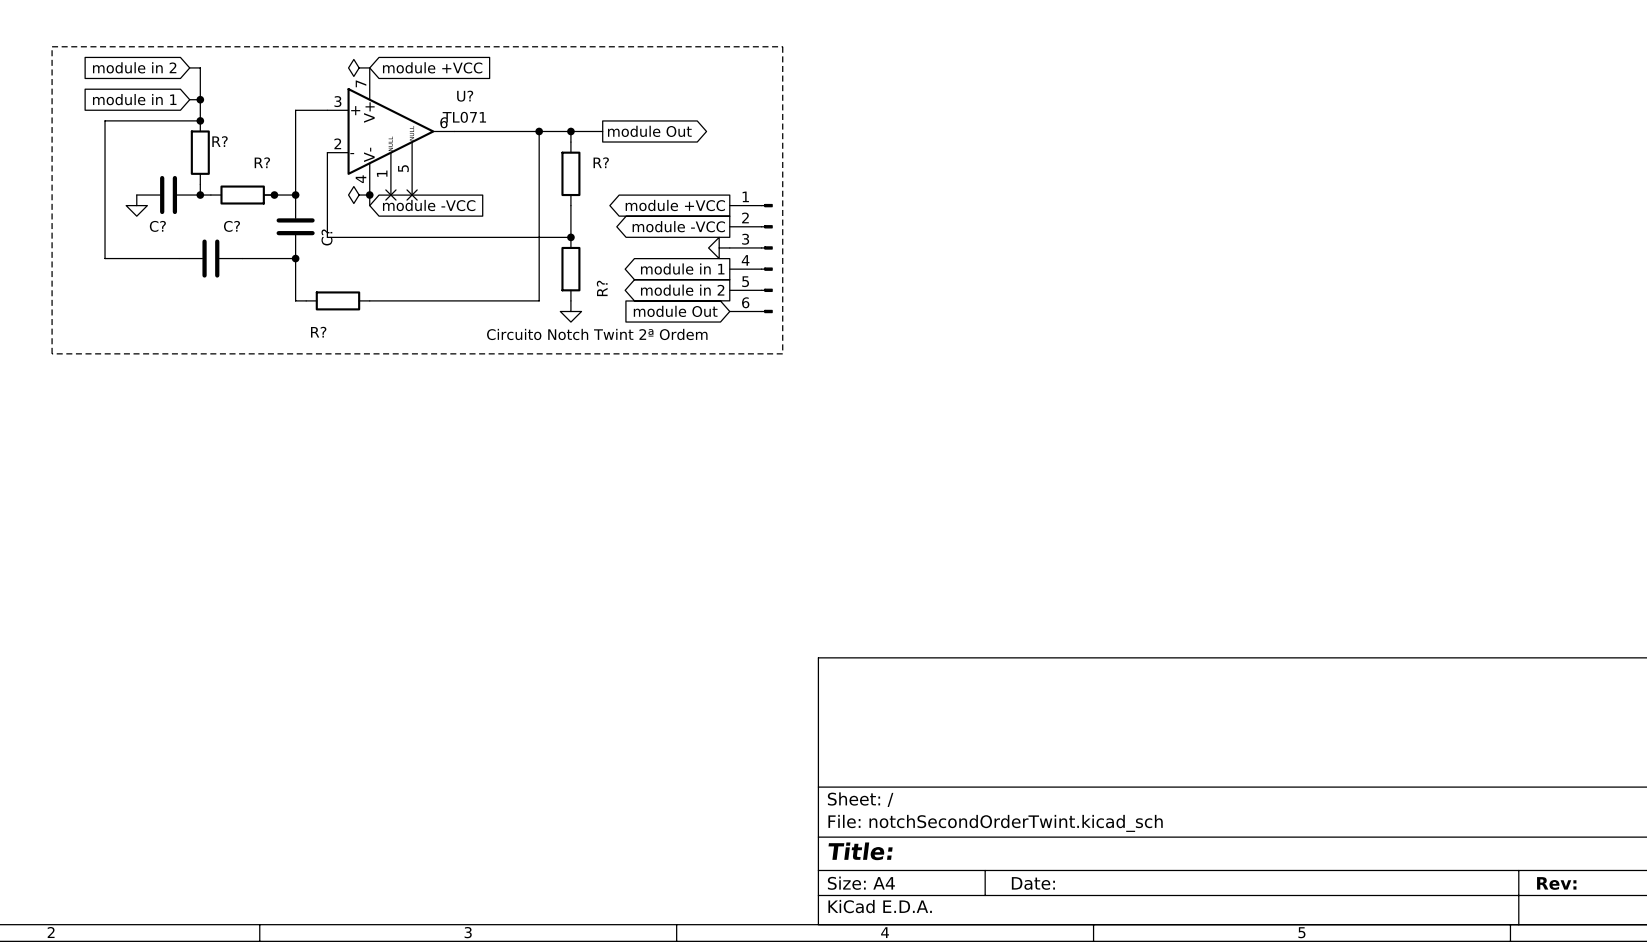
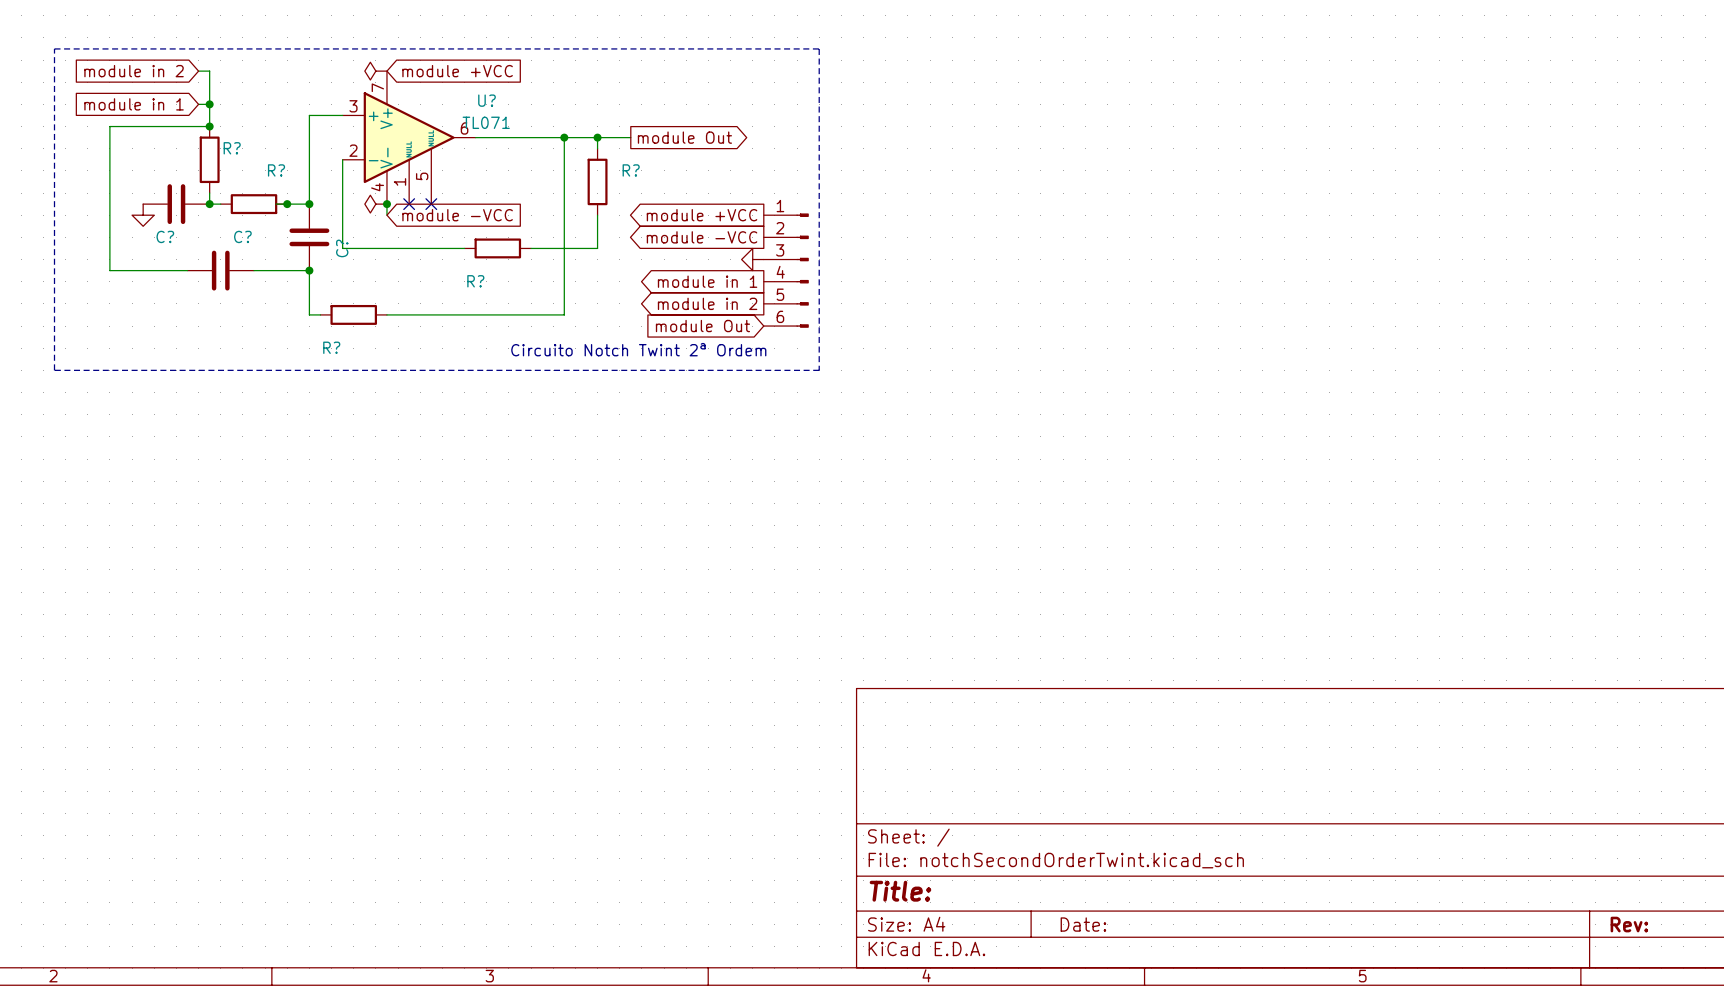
wire: (443, 237) (507, 237) -> none
junction: (570, 237) -> none
R? rotation: 0° (570, 269) -> 90° clockwise (497, 248)
R? position: (570, 269) -> (497, 248)
power symbol: (570, 311) -> none

